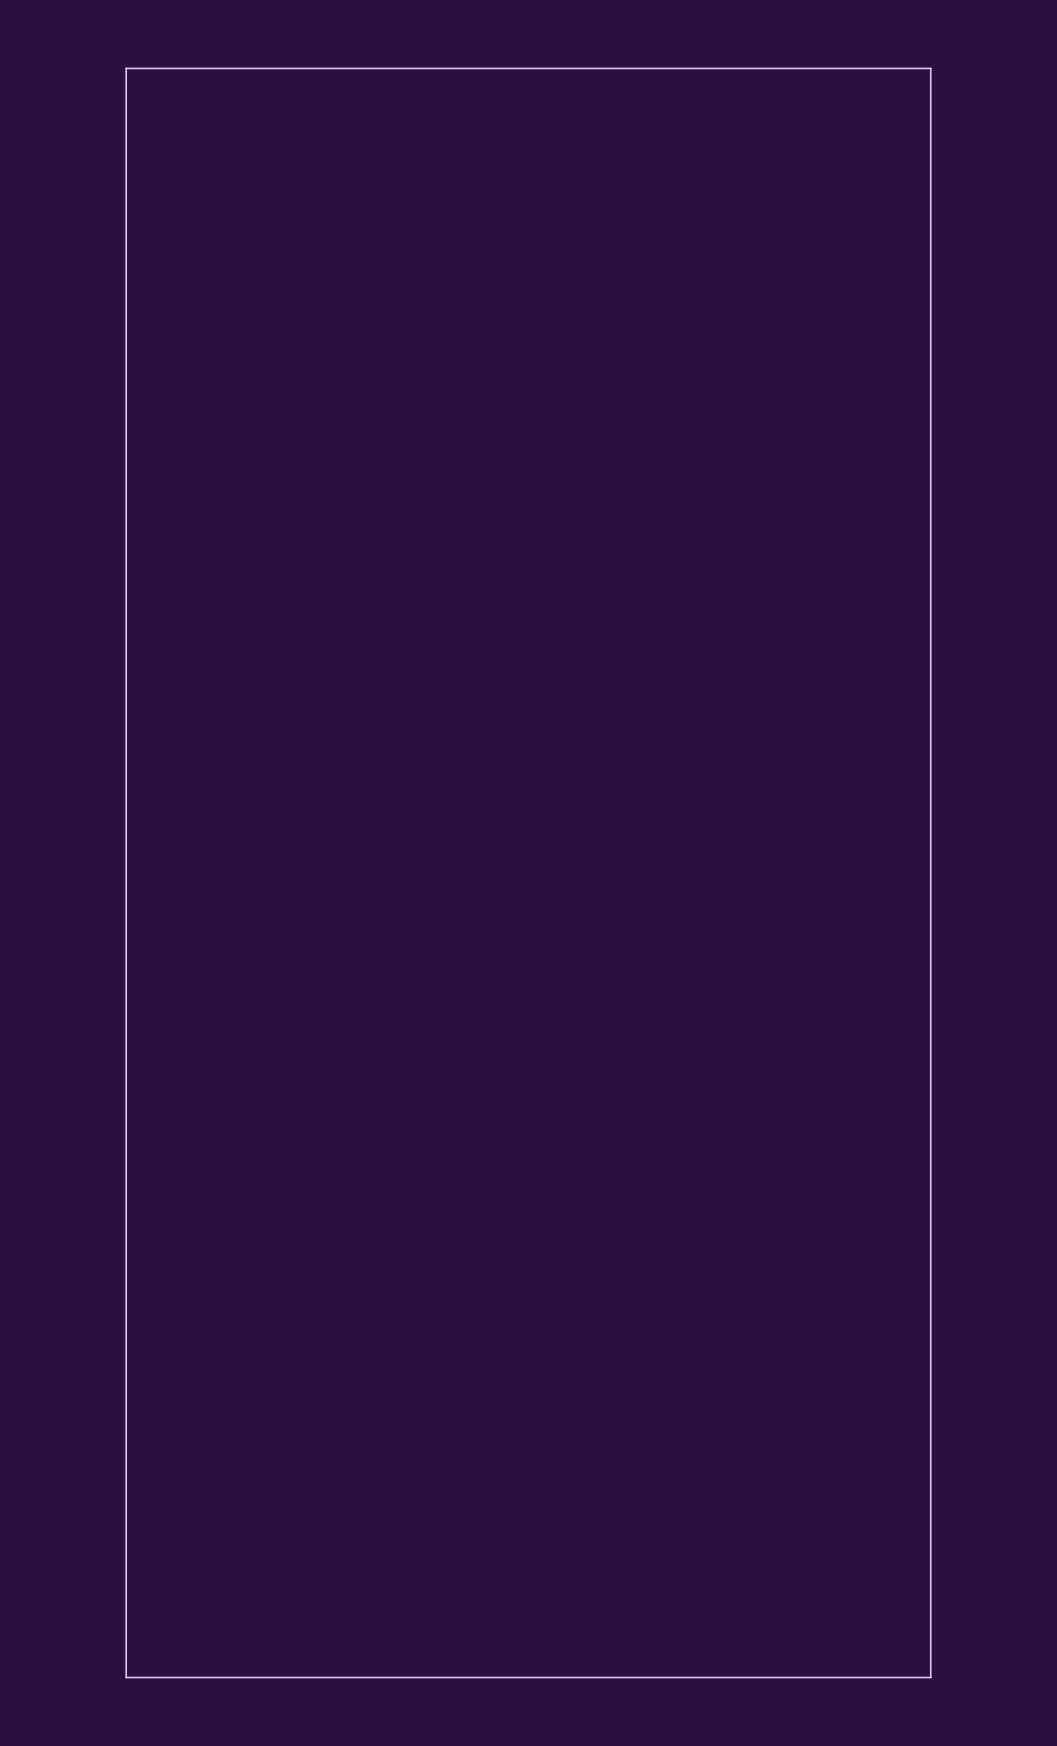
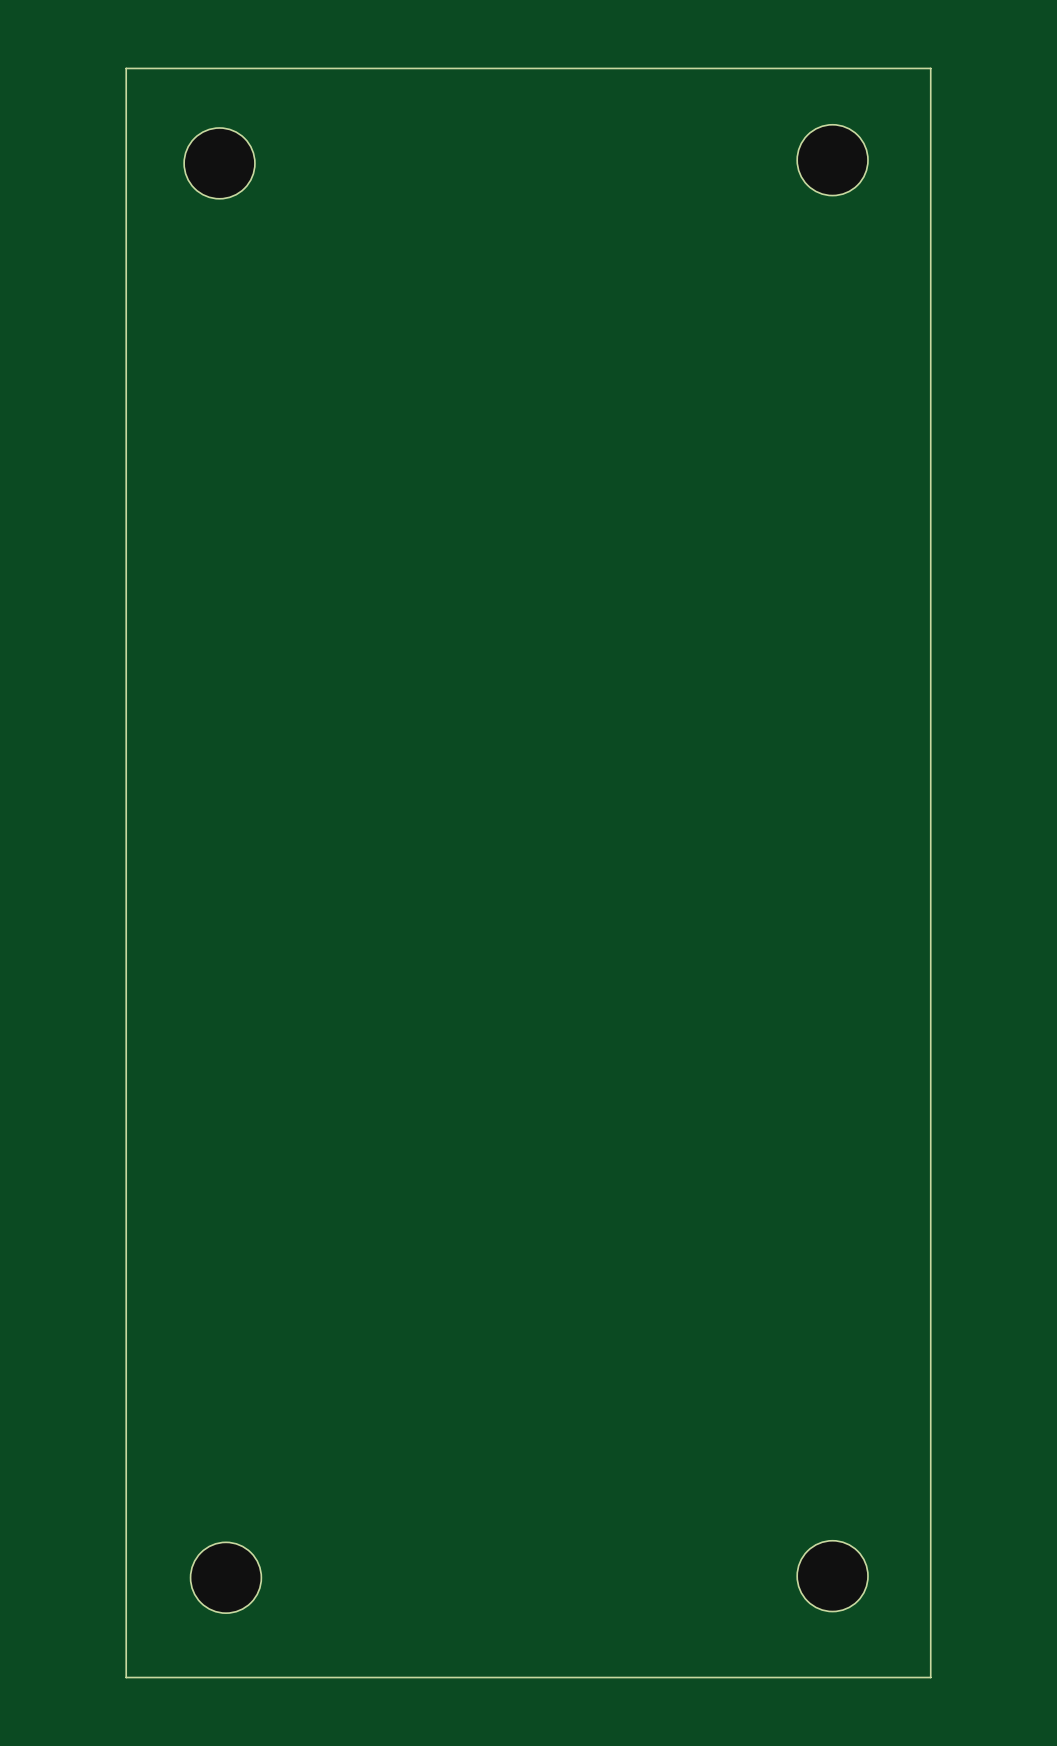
part: none -> (832, 160)
part: none -> (219, 163)
part: none -> (832, 1576)
part: none -> (225, 1577)

